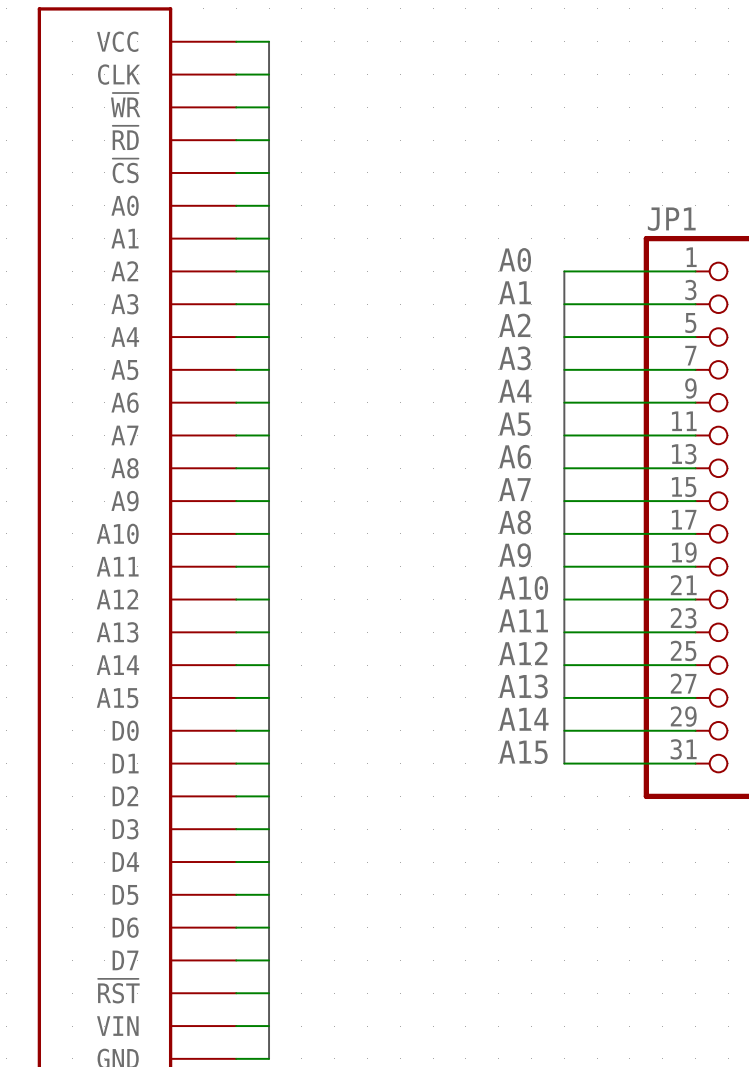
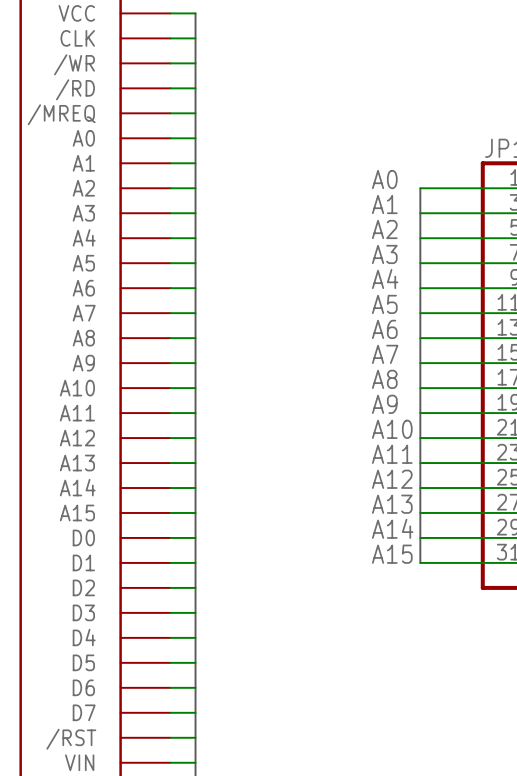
part pin name: ~{WR} (125, 105) -> /WR (74, 64)
part pin name: ~{RD} (125, 137) -> /RD (75, 89)
part pin name: ~{CS} (125, 170) -> /MREQ (61, 114)
part pin name: ~{RST} (118, 991) -> /RST (71, 739)

